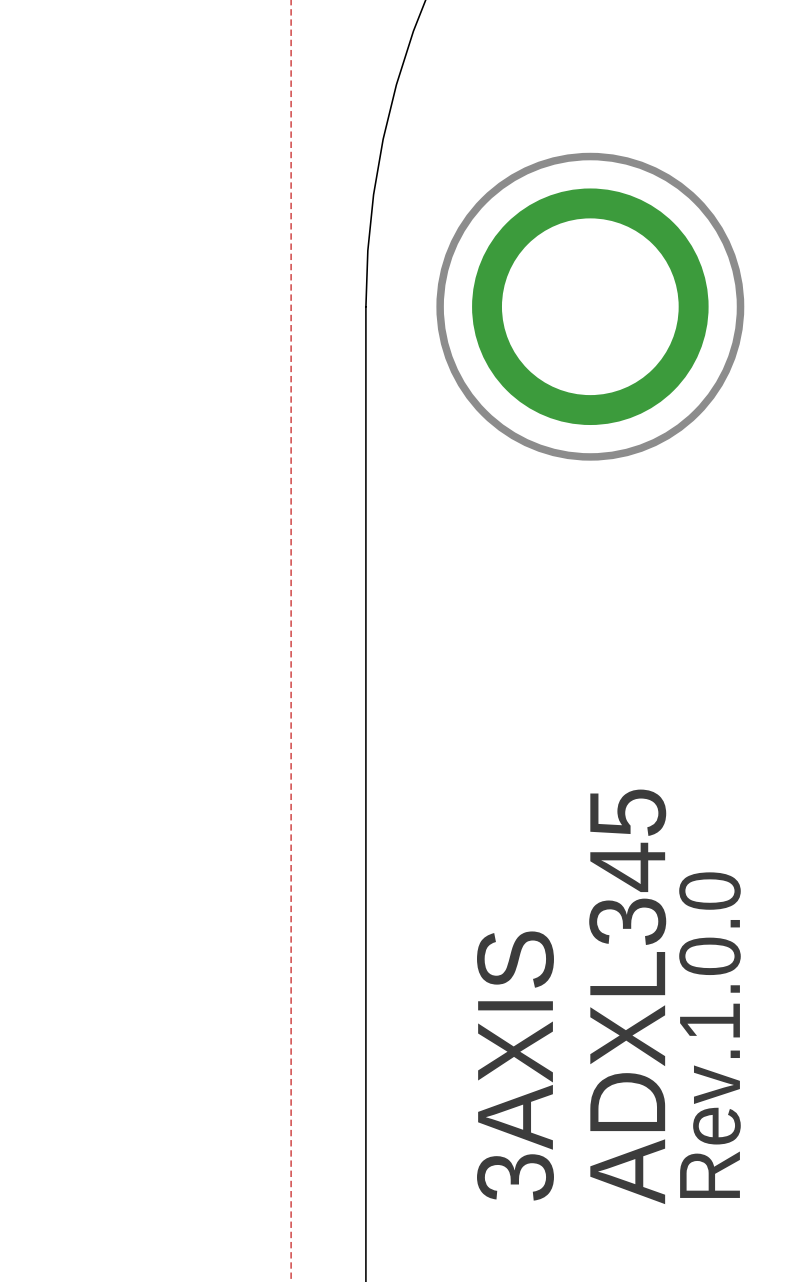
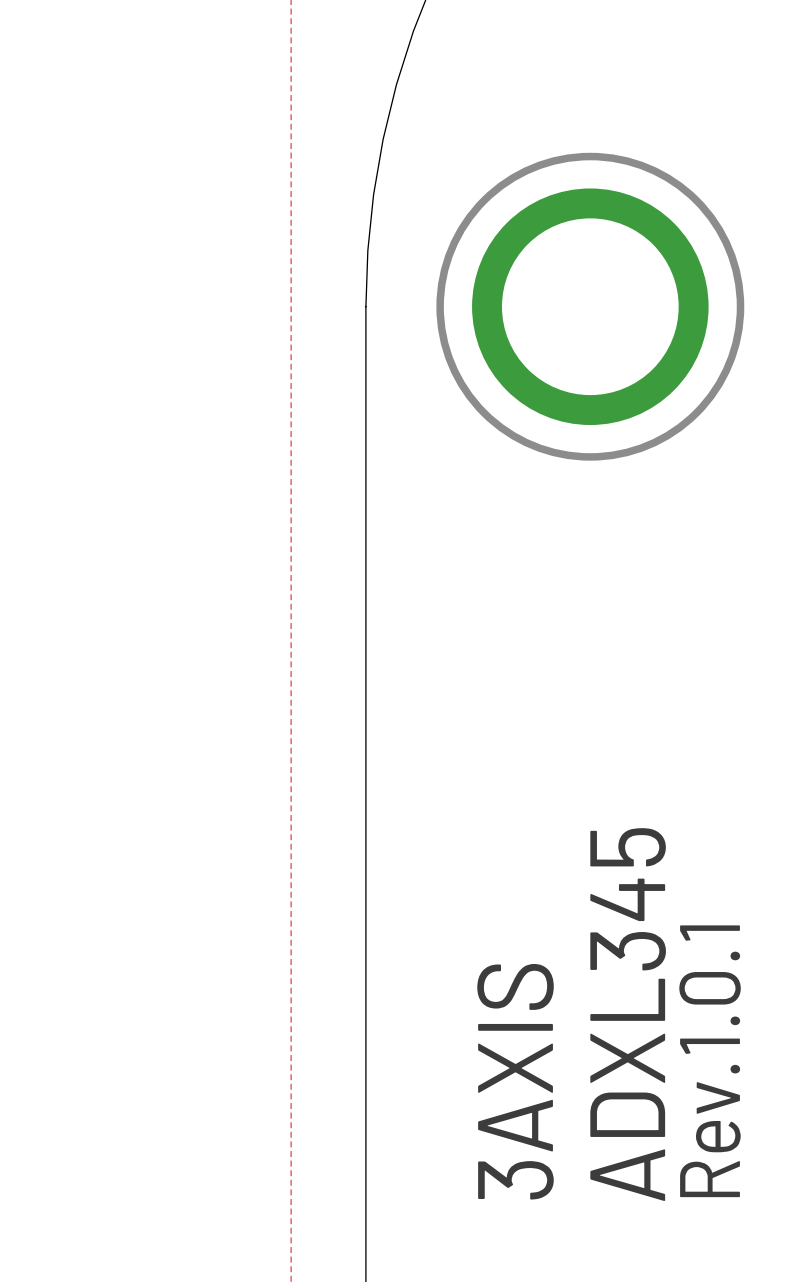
text: Rev.1.0.0 (709, 1035) -> Rev.1.0.1 (710, 1061)

